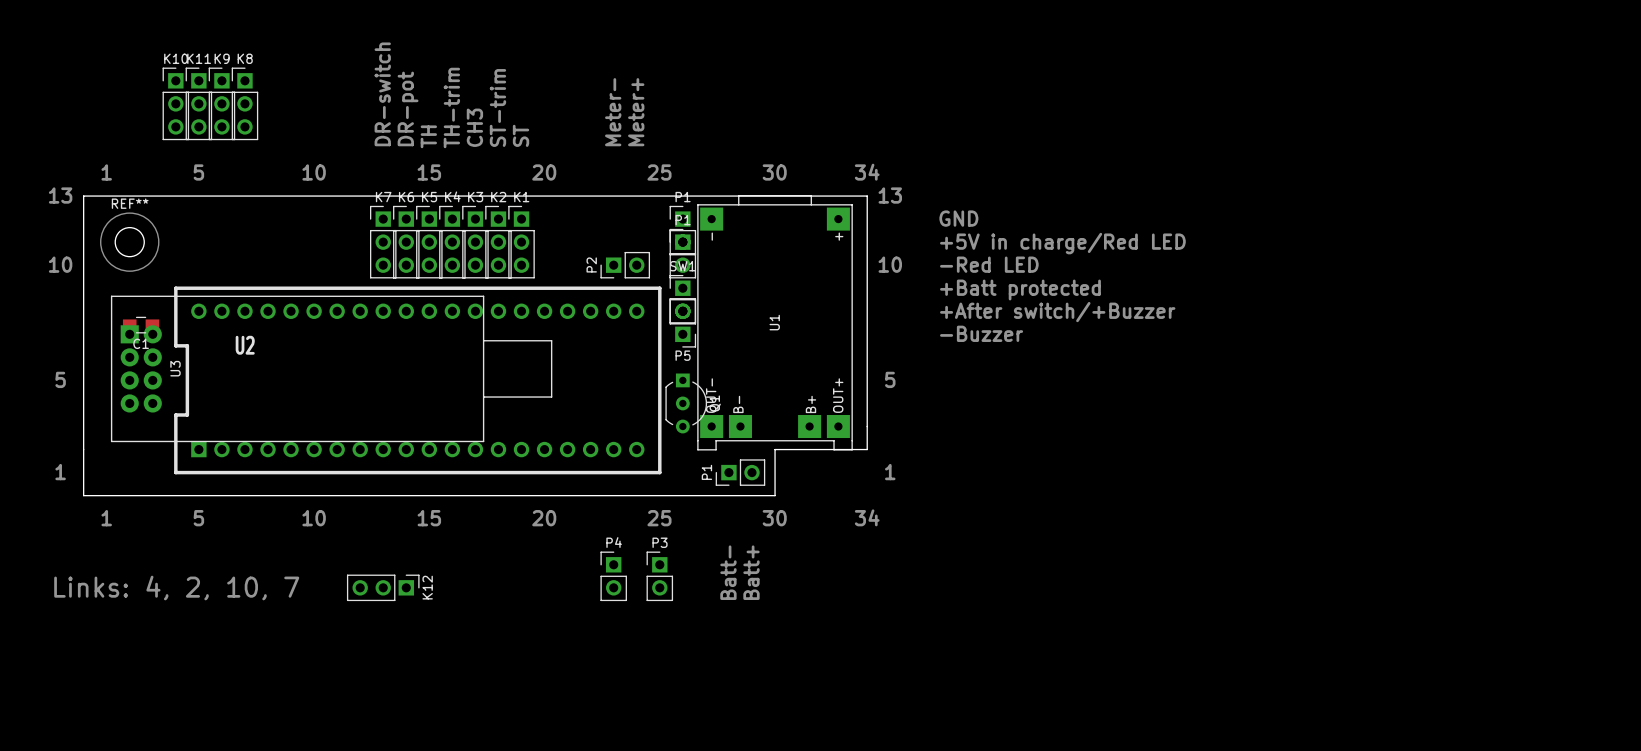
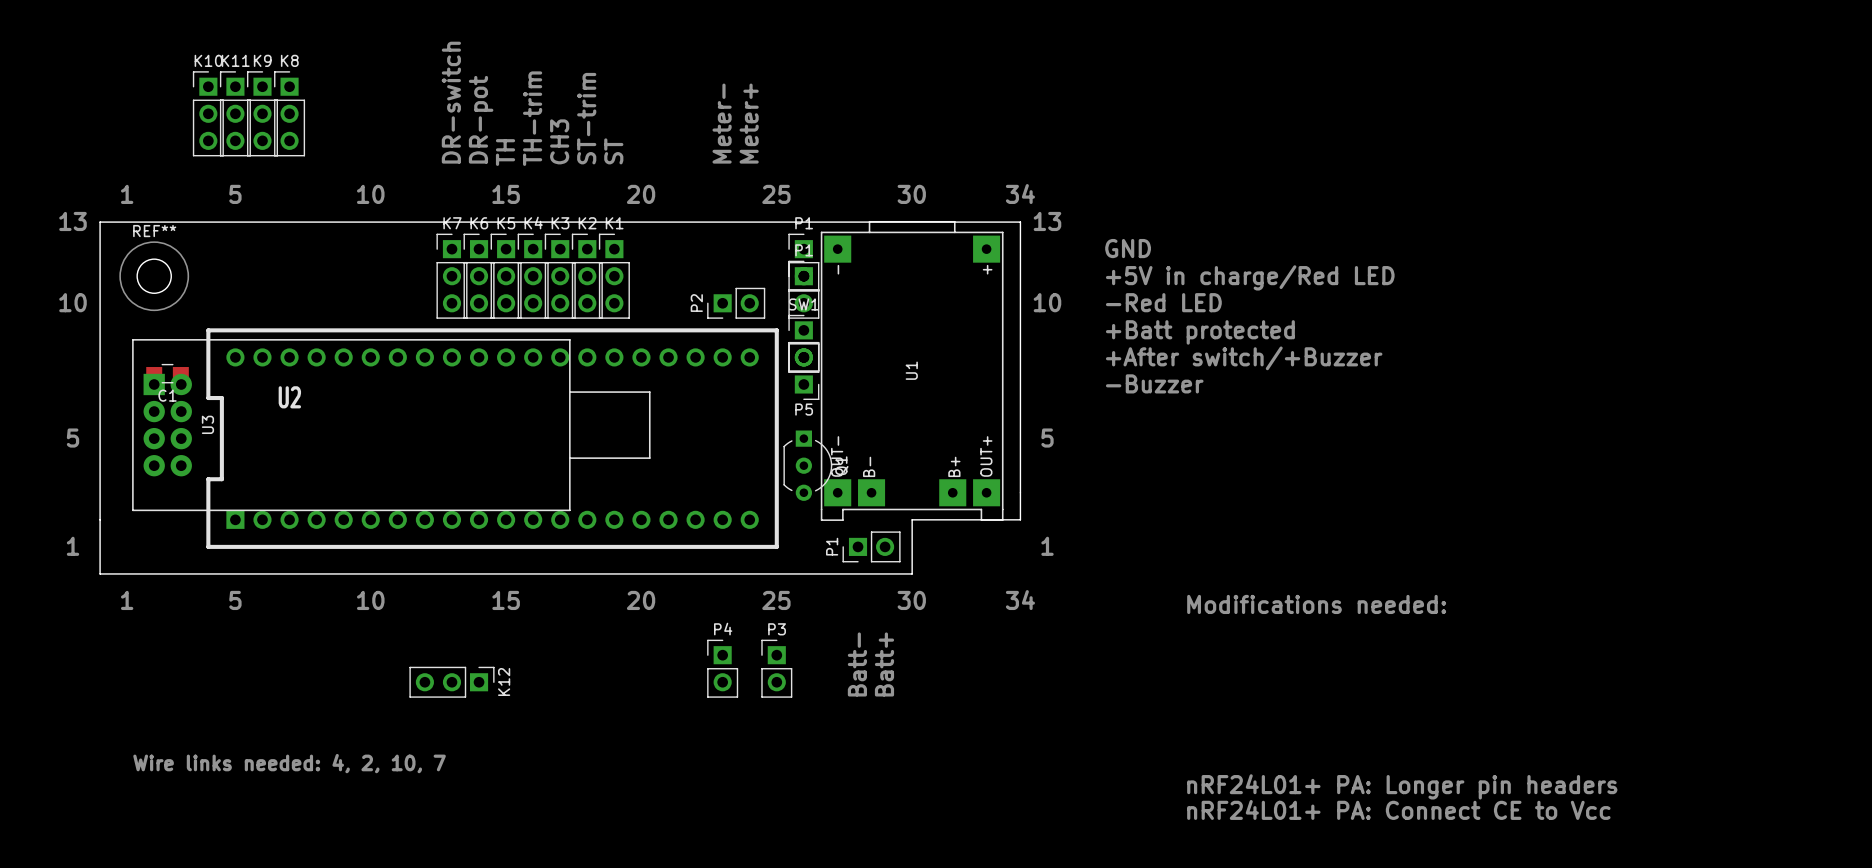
text: none -> Modifications needed: (1316, 604)
text: Links: 4, 2, 10, 7 (176, 588) -> none
text: none -> Wire links needed: 4, 2, 10, 7 (289, 763)
text: none -> nRF24L01+ PA: Longer pin headers (1402, 786)
text: none -> nRF24L01+ PA: Connect CE to Vcc (1398, 809)

